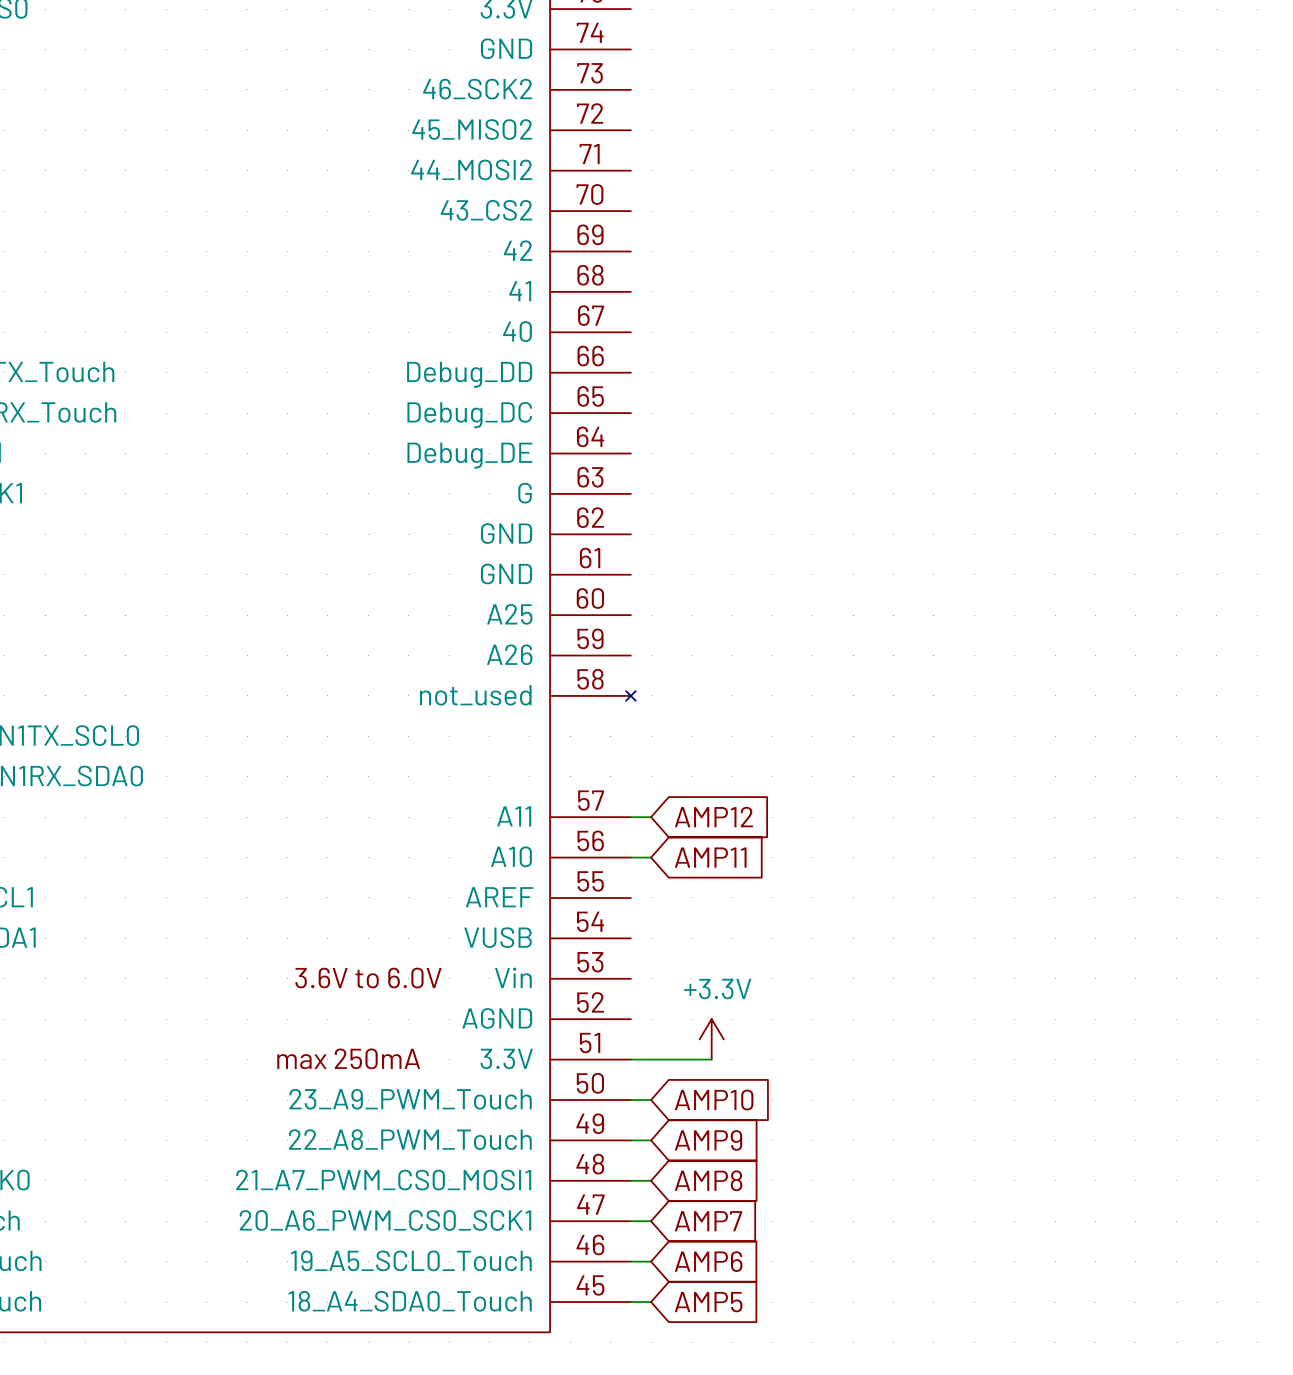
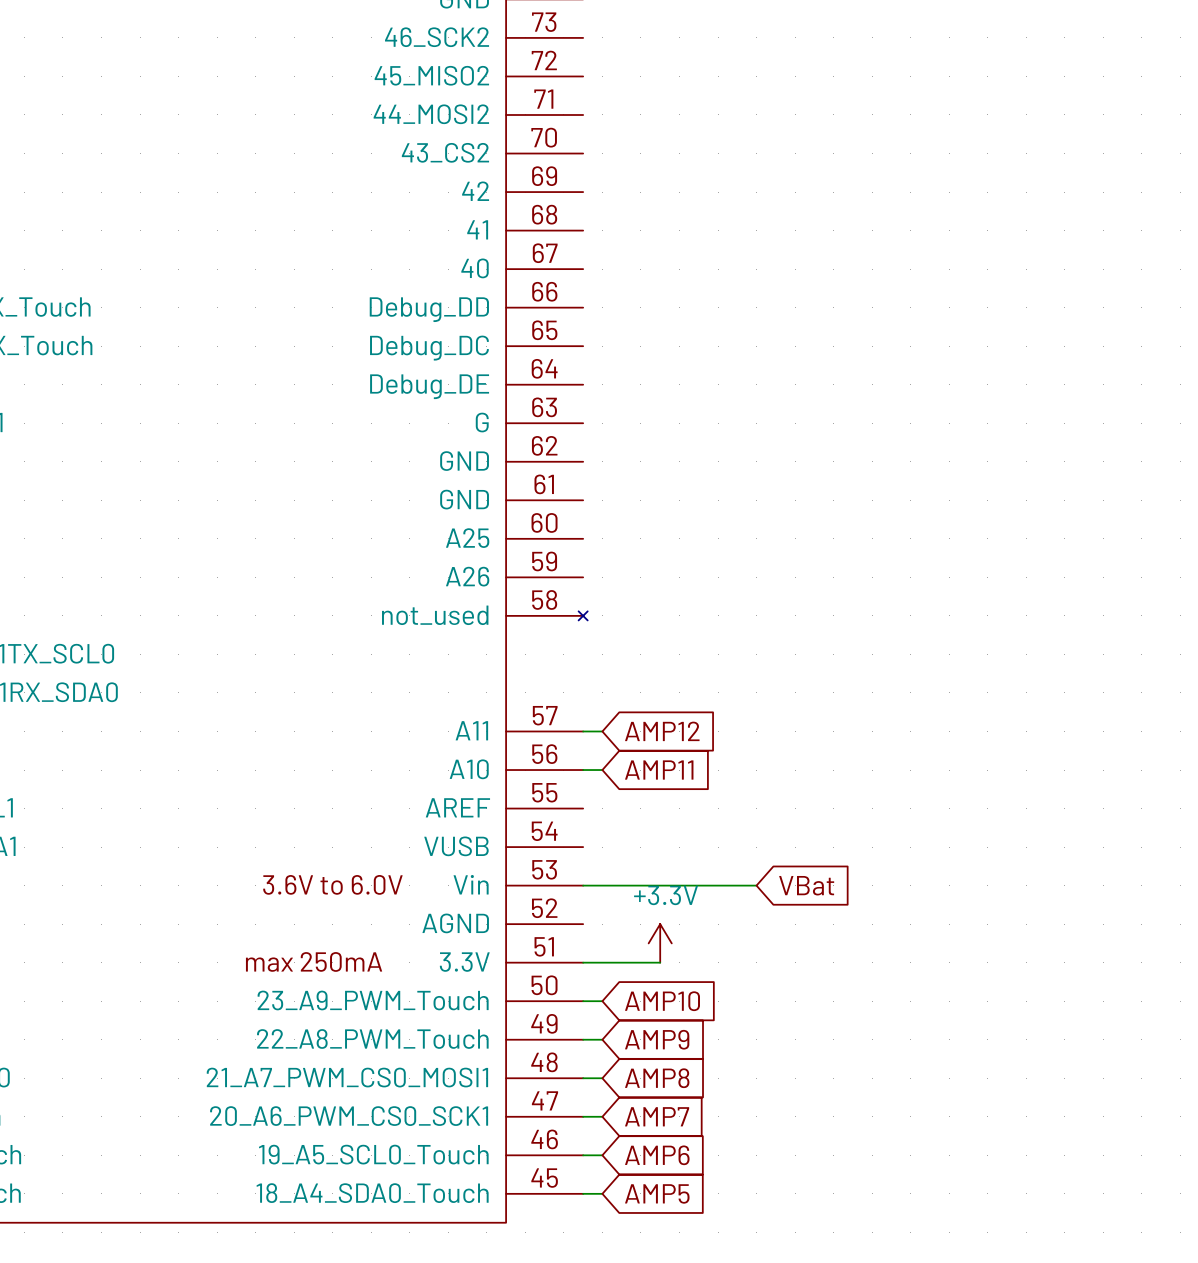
wire: none -> (583, 885) (756, 885)
global label: none -> VBat (806, 885)

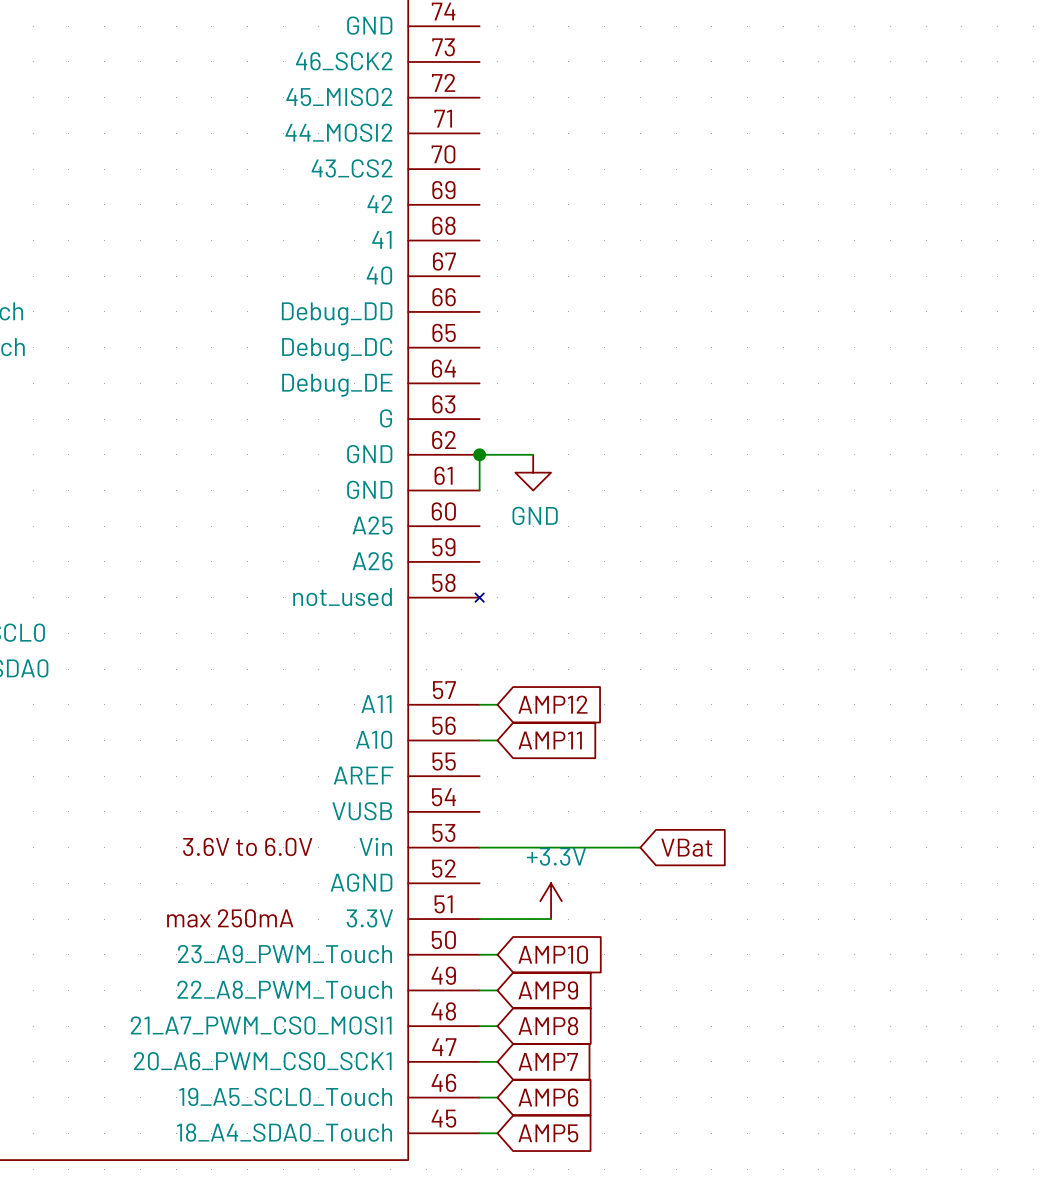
junction: none -> (479, 454)
wire: none -> (533, 454) (479, 454) (479, 490)
power symbol: none -> GND (533, 472)

